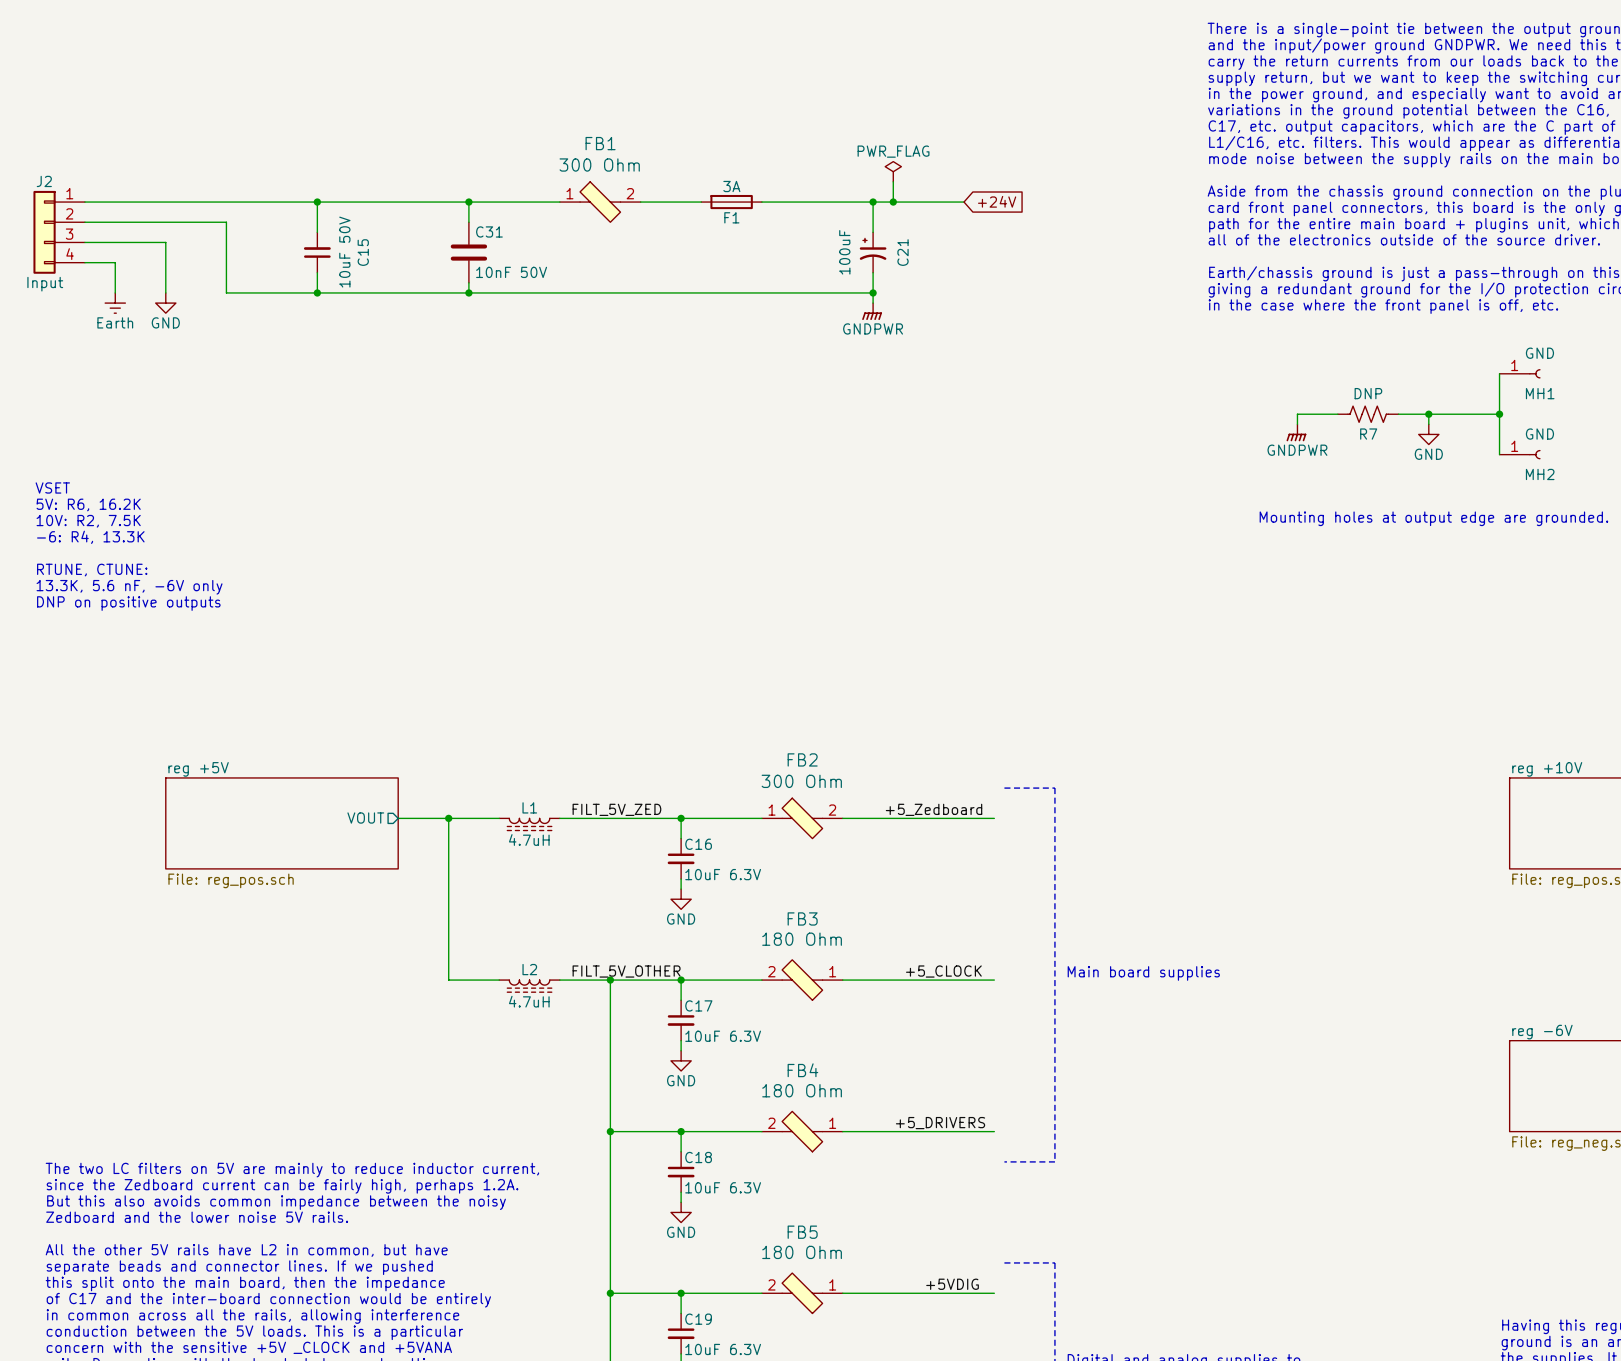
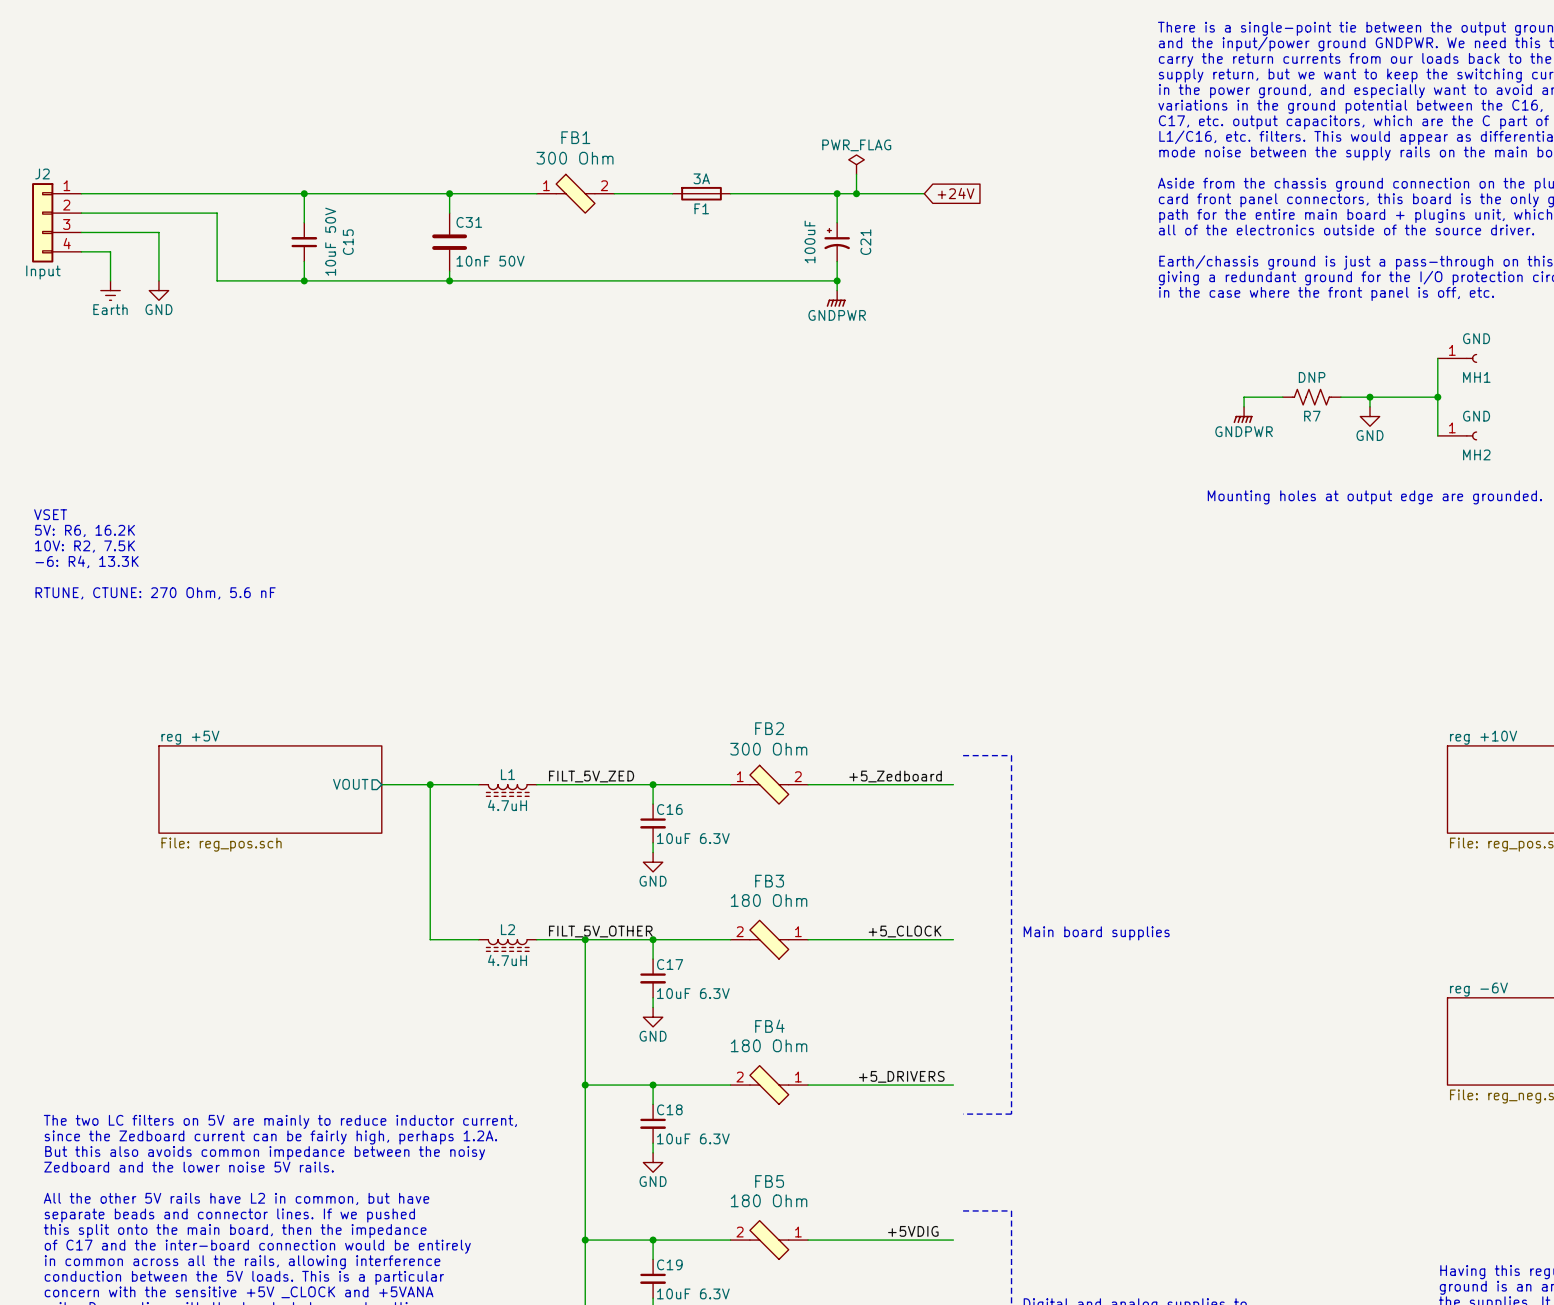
text: VSET (52, 487) -> none
text position: 5V: R6, 16.2K (88, 504) -> 5V: R6, 16.2K (85, 530)
text: 10V: R2, 7.5K (88, 521) -> none
text: -6: R4, 13.3K (90, 537) -> VSET (50, 514)
text: RTUNE, CTUNE: (92, 570) -> 10V: R2, 7.5K (85, 546)
text: 13.3K, 5.6 nF, -6V only (129, 587) -> -6: R4, 13.3K (87, 561)
text: DNP on positive outputs (128, 603) -> none
text: none -> RTUNE, CTUNE: 270 Ohm, 5.6 nF (155, 593)

